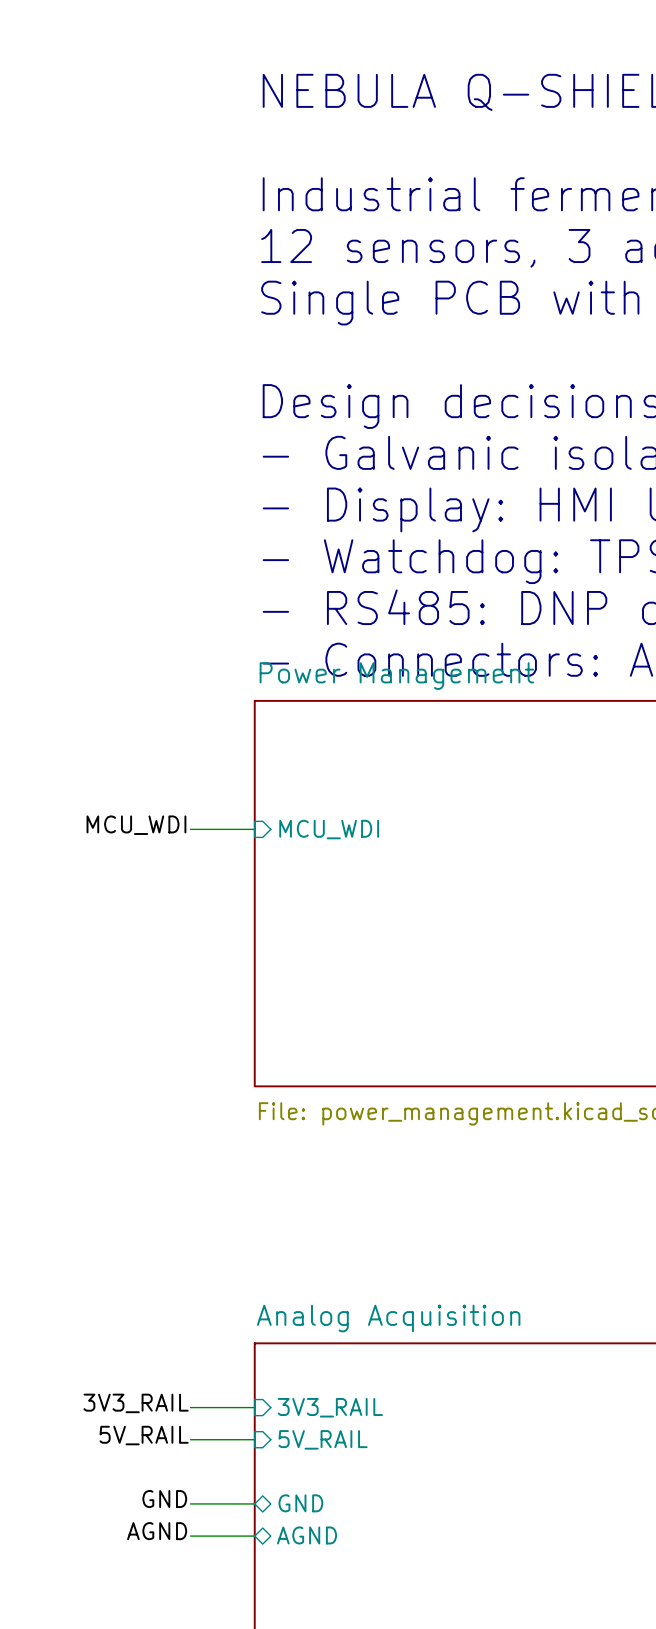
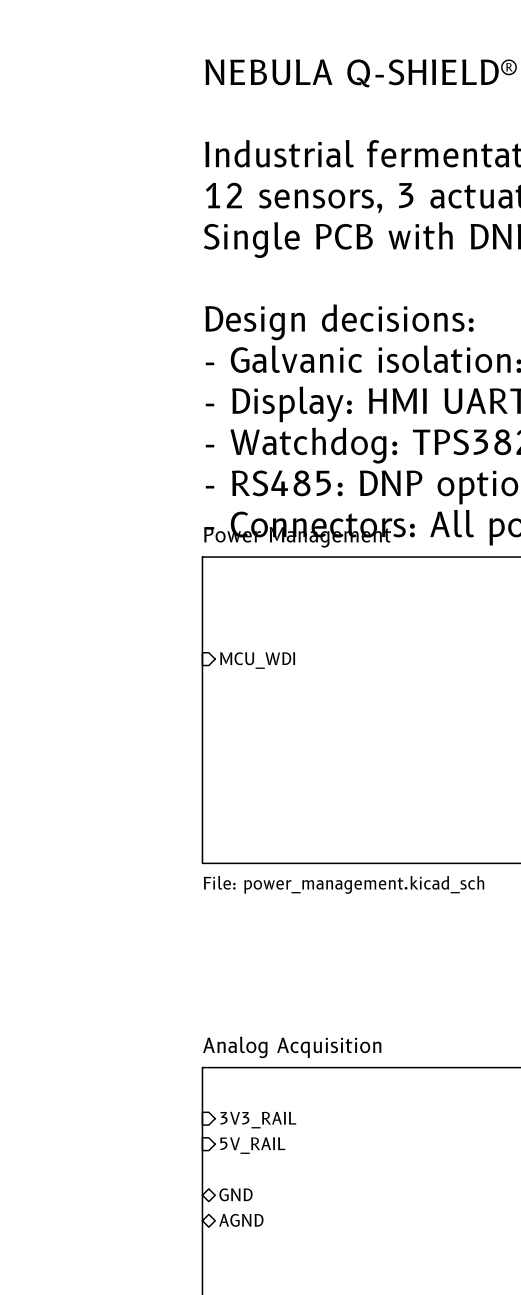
label: MCU_WDI (136, 825) -> none
wire: (190, 829) (254, 829) -> none
label: 3V3_RAIL (136, 1403) -> none
wire: (190, 1407) (254, 1407) -> none
label: 5V_RAIL (144, 1435) -> none
wire: (190, 1439) (254, 1439) -> none
label: GND (164, 1499) -> none
wire: (190, 1503) (254, 1503) -> none
label: AGND (157, 1531) -> none
wire: (190, 1536) (254, 1536) -> none

